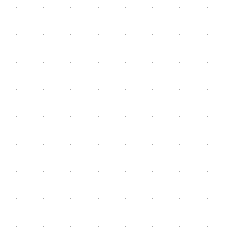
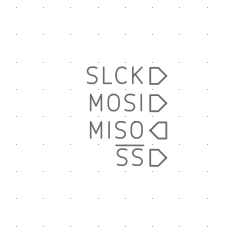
hierarchical label: none -> SLCK (114, 75)
hierarchical label: none -> MOSI (115, 102)
hierarchical label: none -> MISO (116, 129)
hierarchical label: none -> ~{SS} (129, 155)

